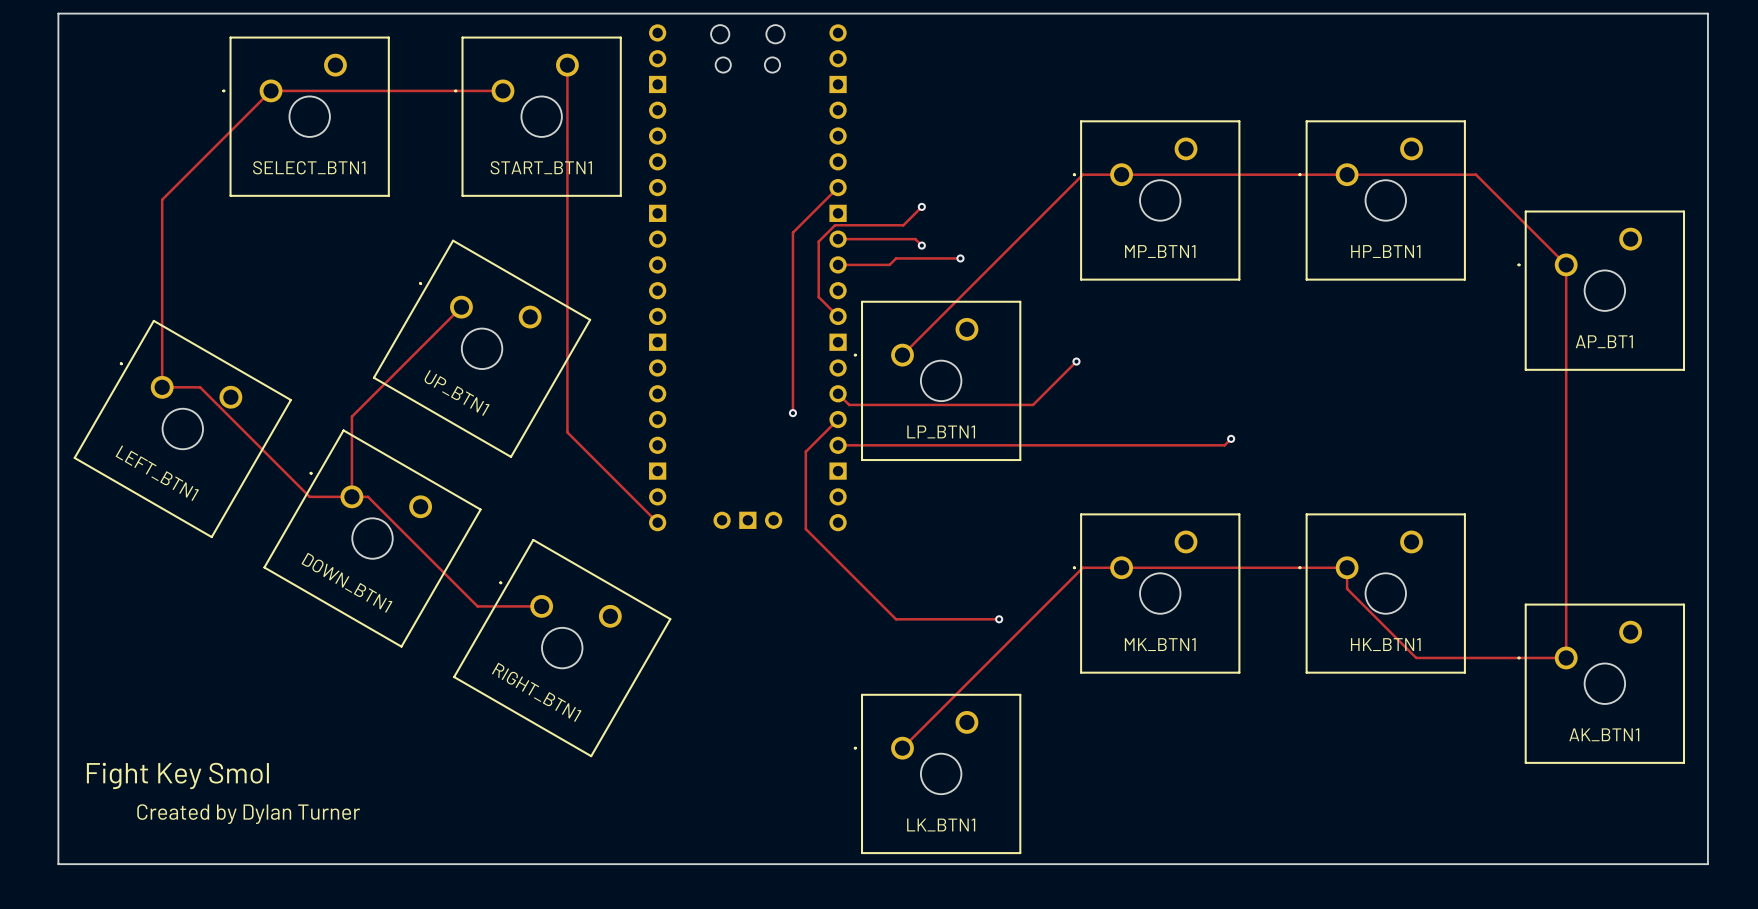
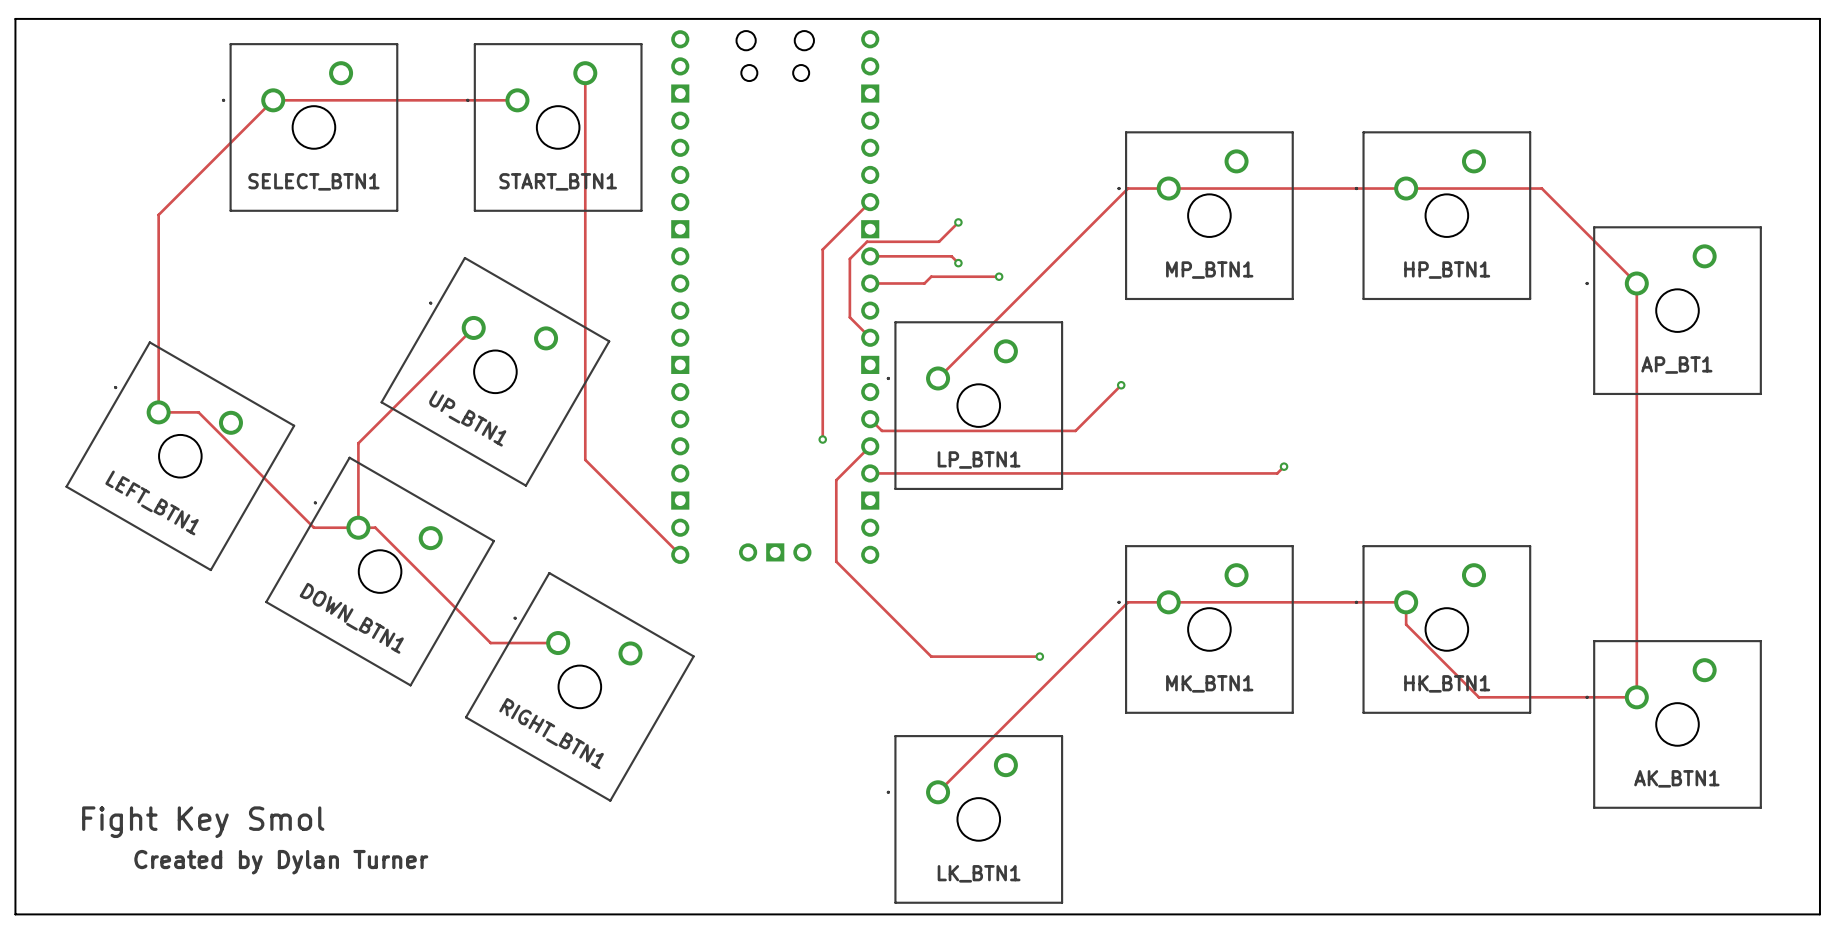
board edge: (58, 13) (58, 864) -> (49, 18) (15, 18) (15, 914) (49, 914)
board edge: (1707, 13) (1707, 864) -> (1786, 18) (1819, 18) (1819, 914) (1786, 914)

